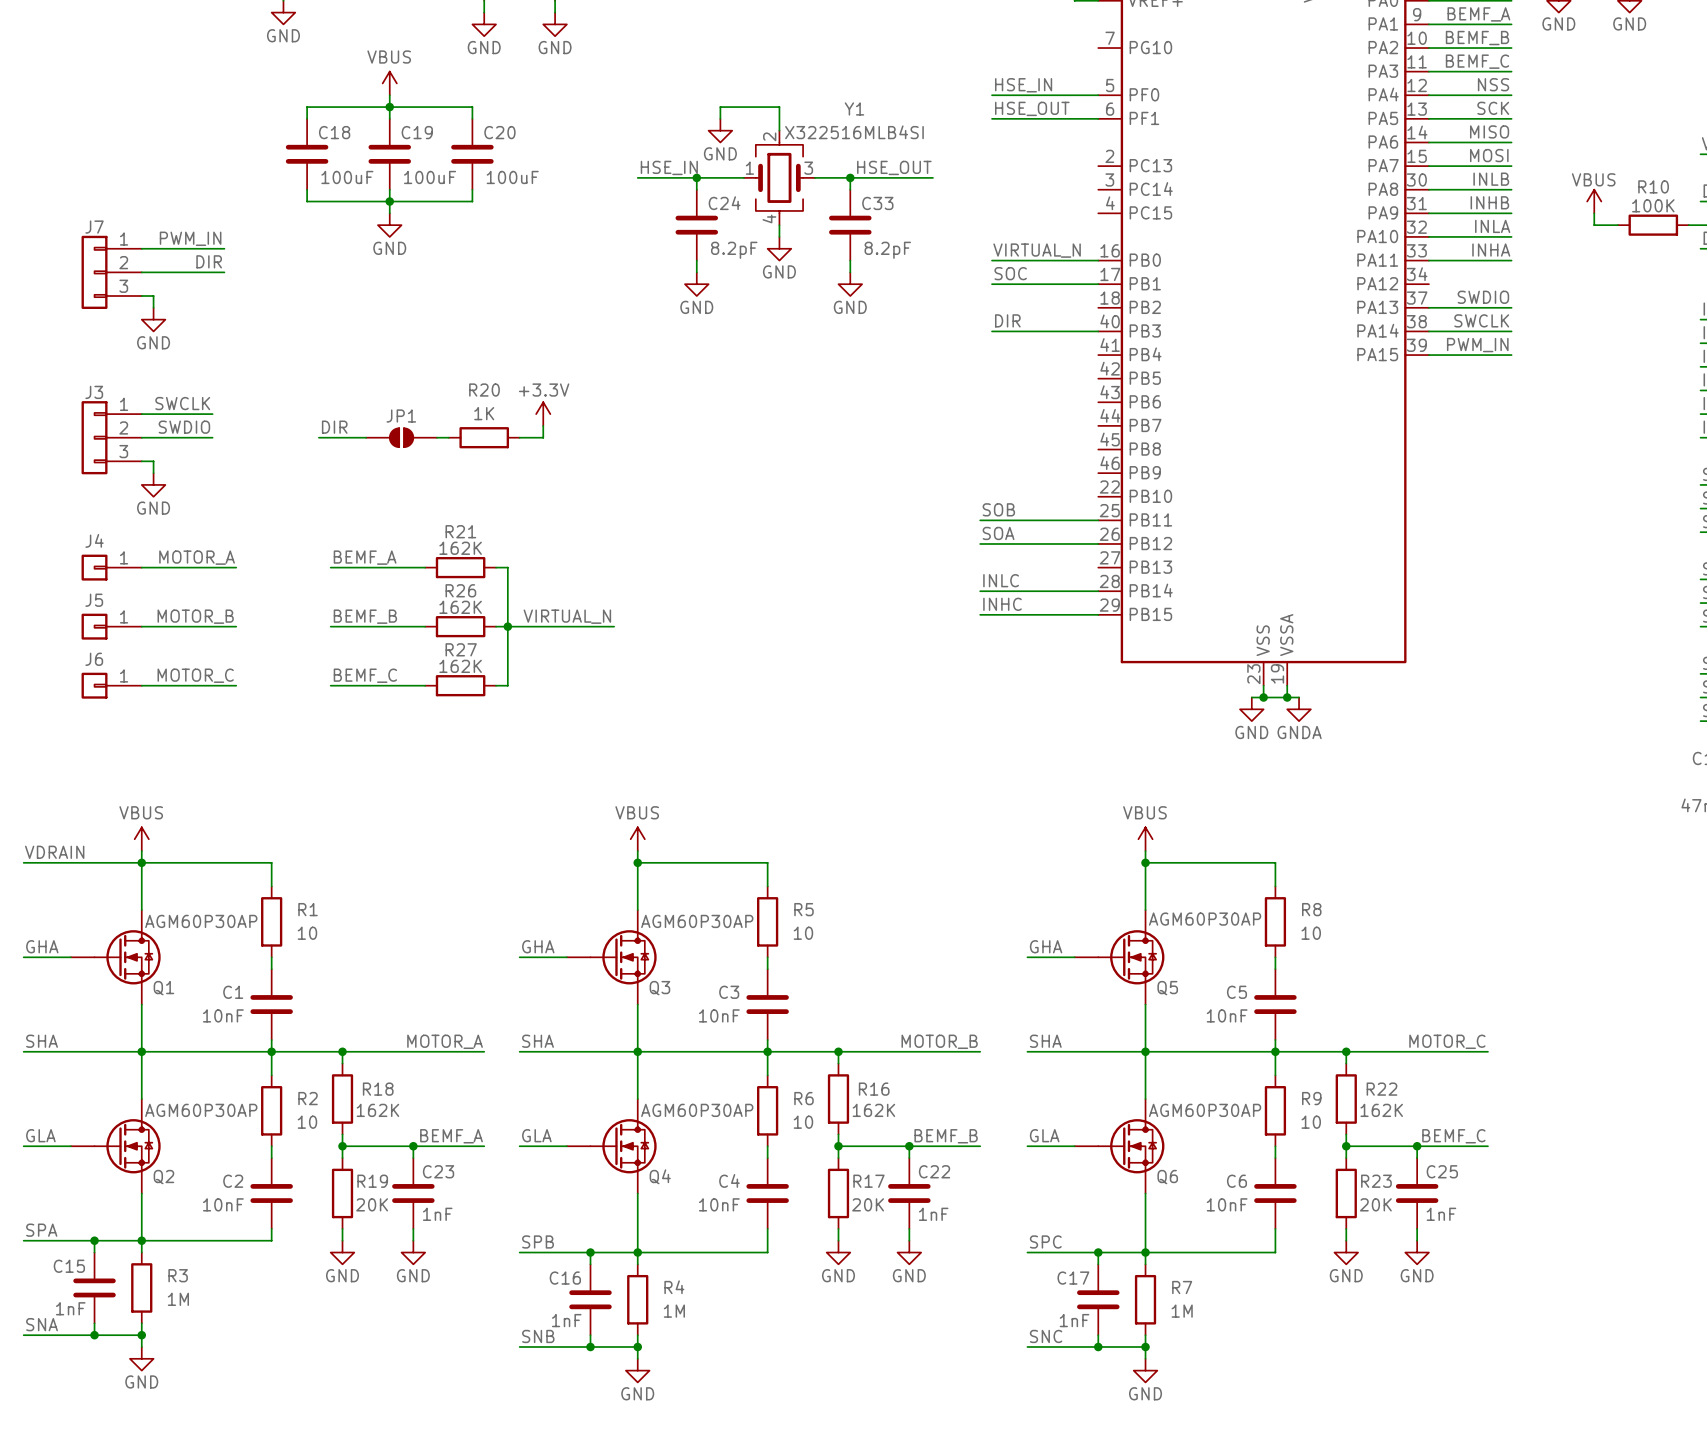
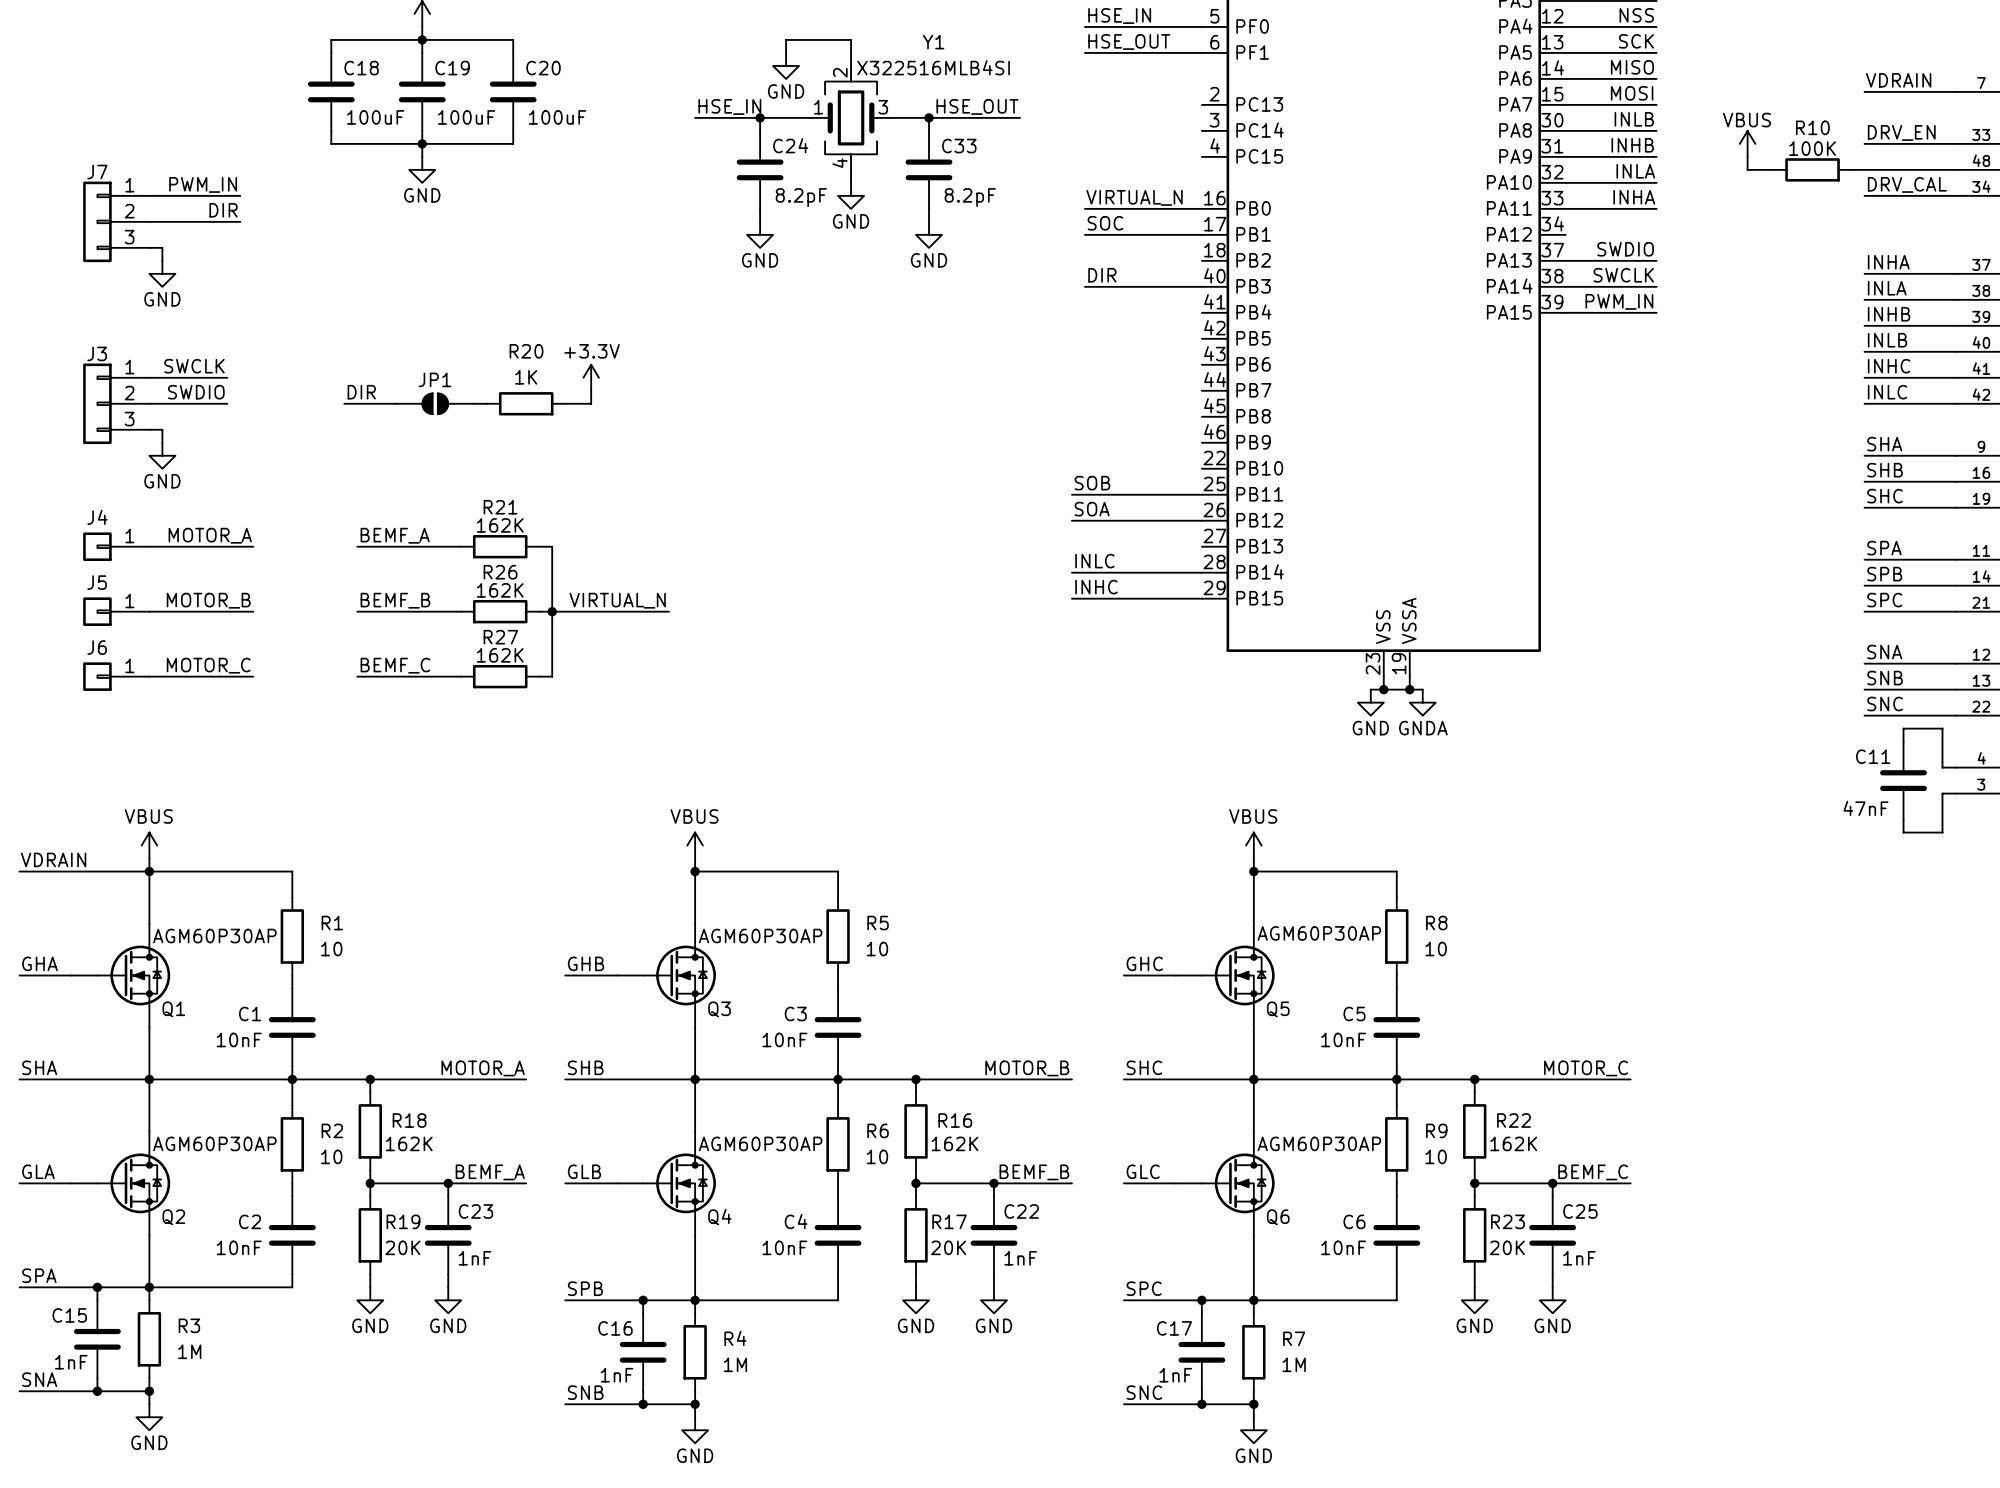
label: GHA (538, 946) -> GHB (586, 963)
label: GHA (1046, 946) -> GHC (1144, 963)
label: SHA (538, 1041) -> SHB (585, 1067)
label: SHA (1045, 1041) -> SHC (1144, 1067)
label: GLA (536, 1135) -> GLB (584, 1171)
label: GLA (1044, 1135) -> GLC (1143, 1171)

